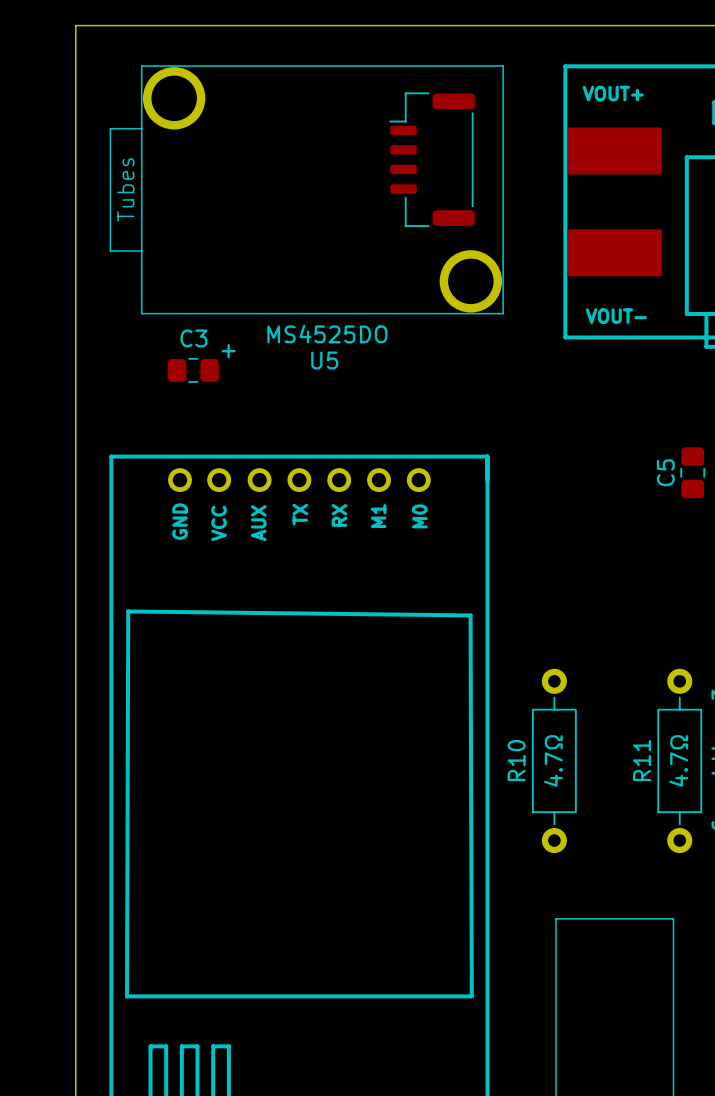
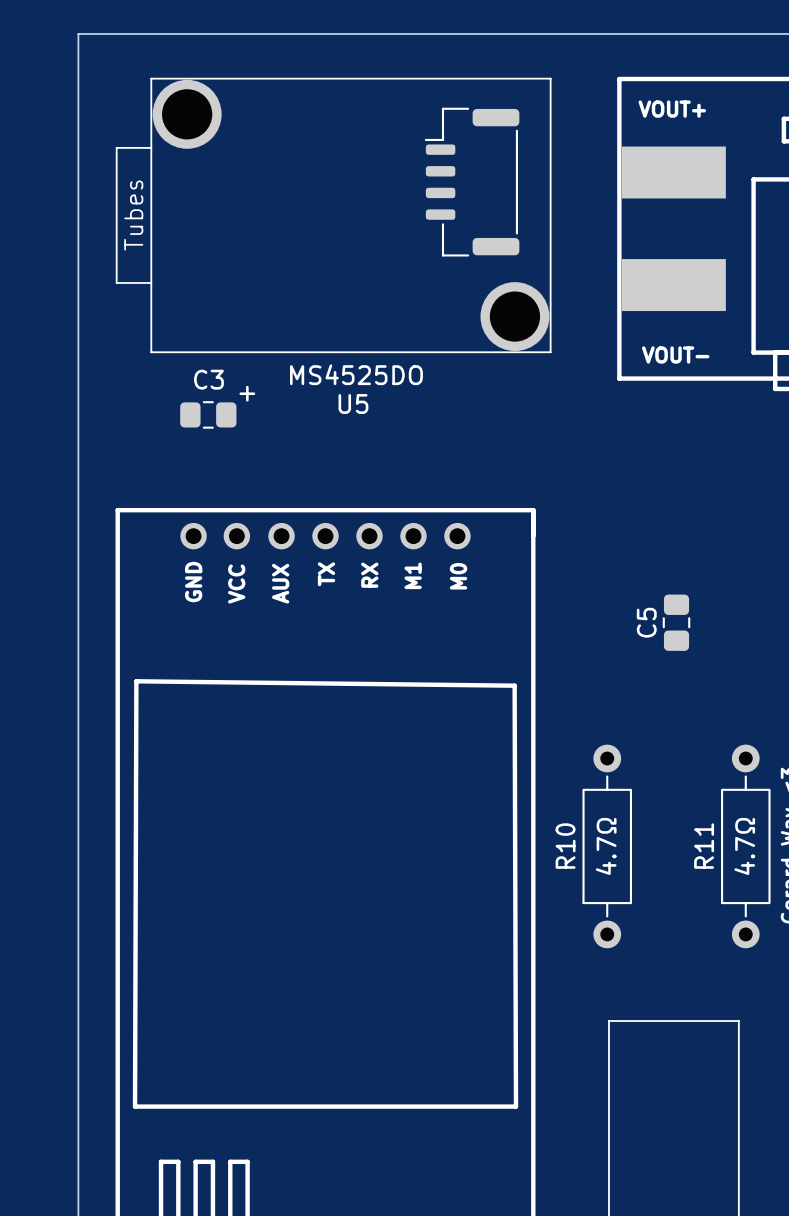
C5 position: (692, 472) -> (676, 622)

